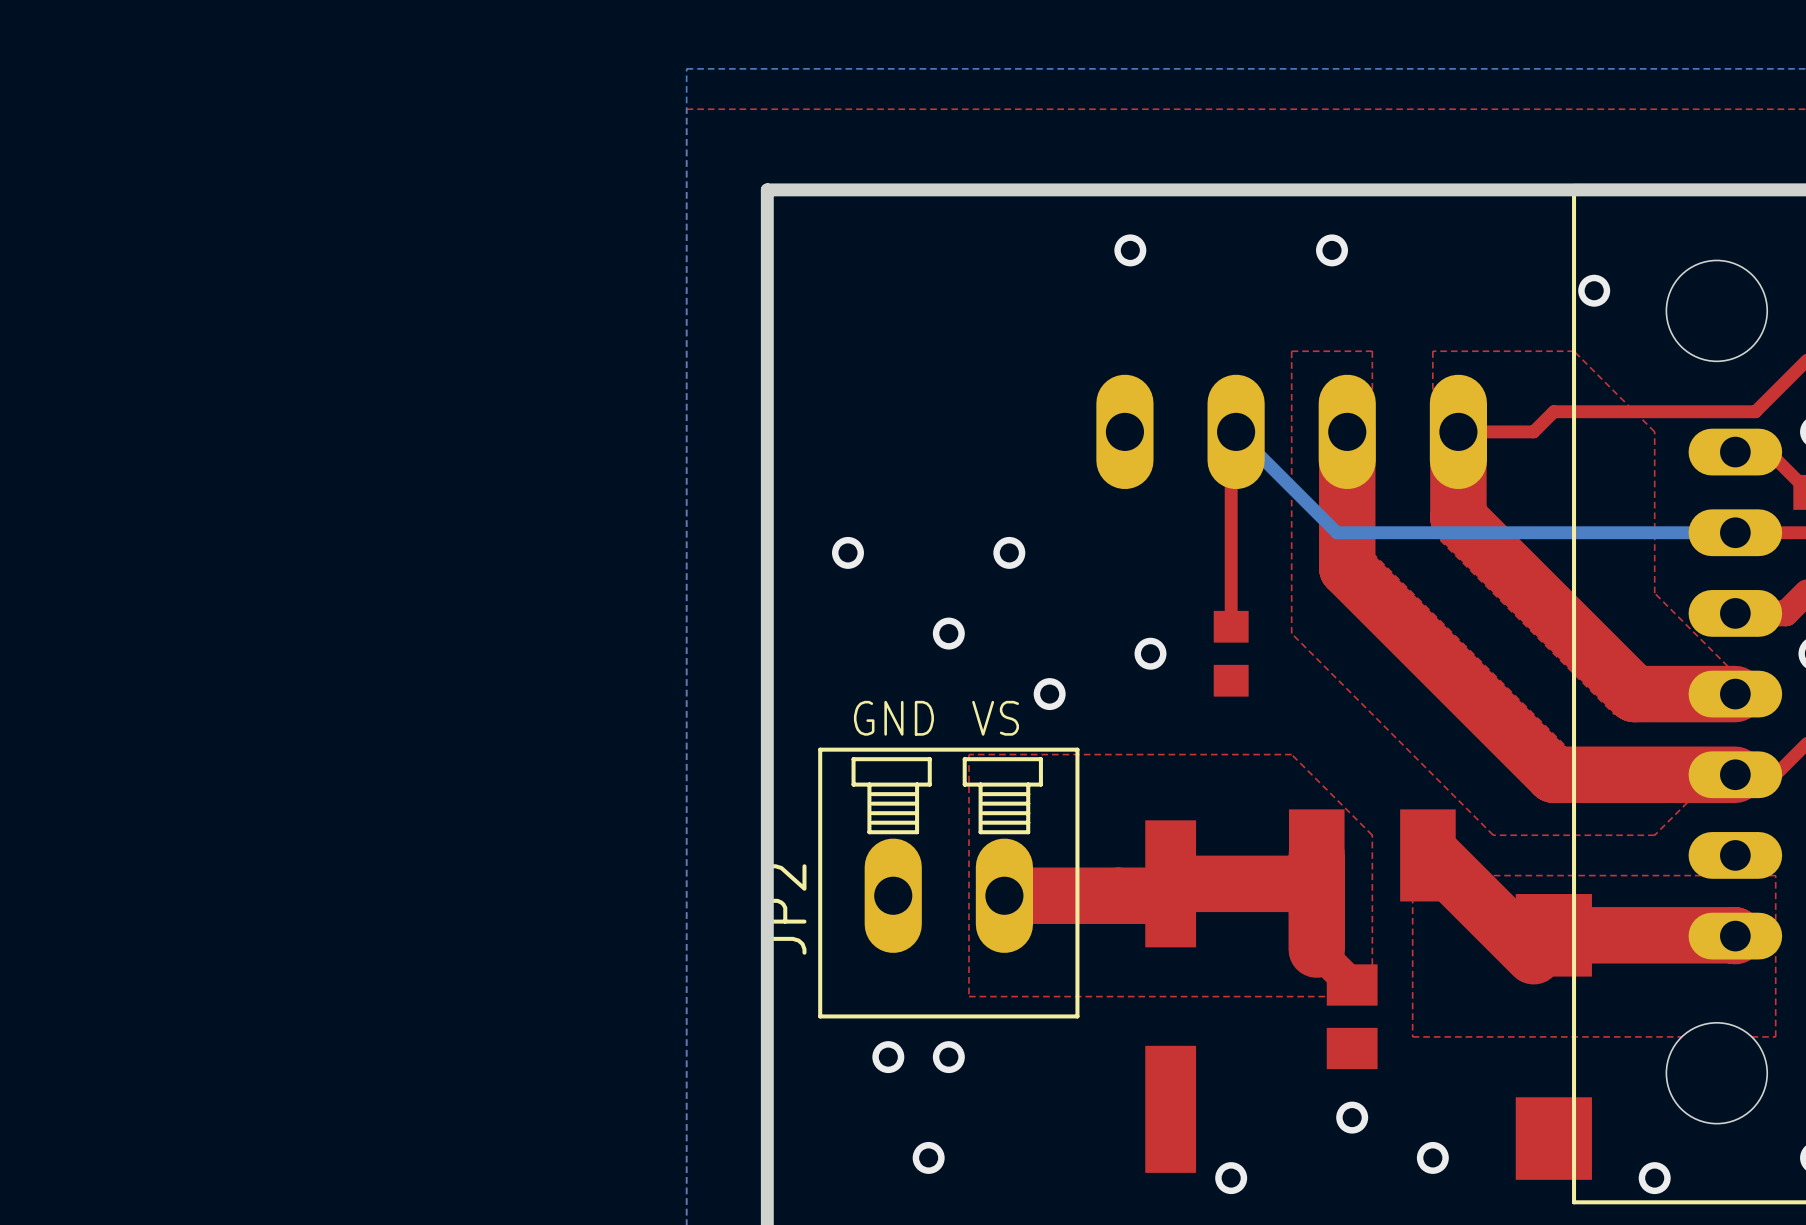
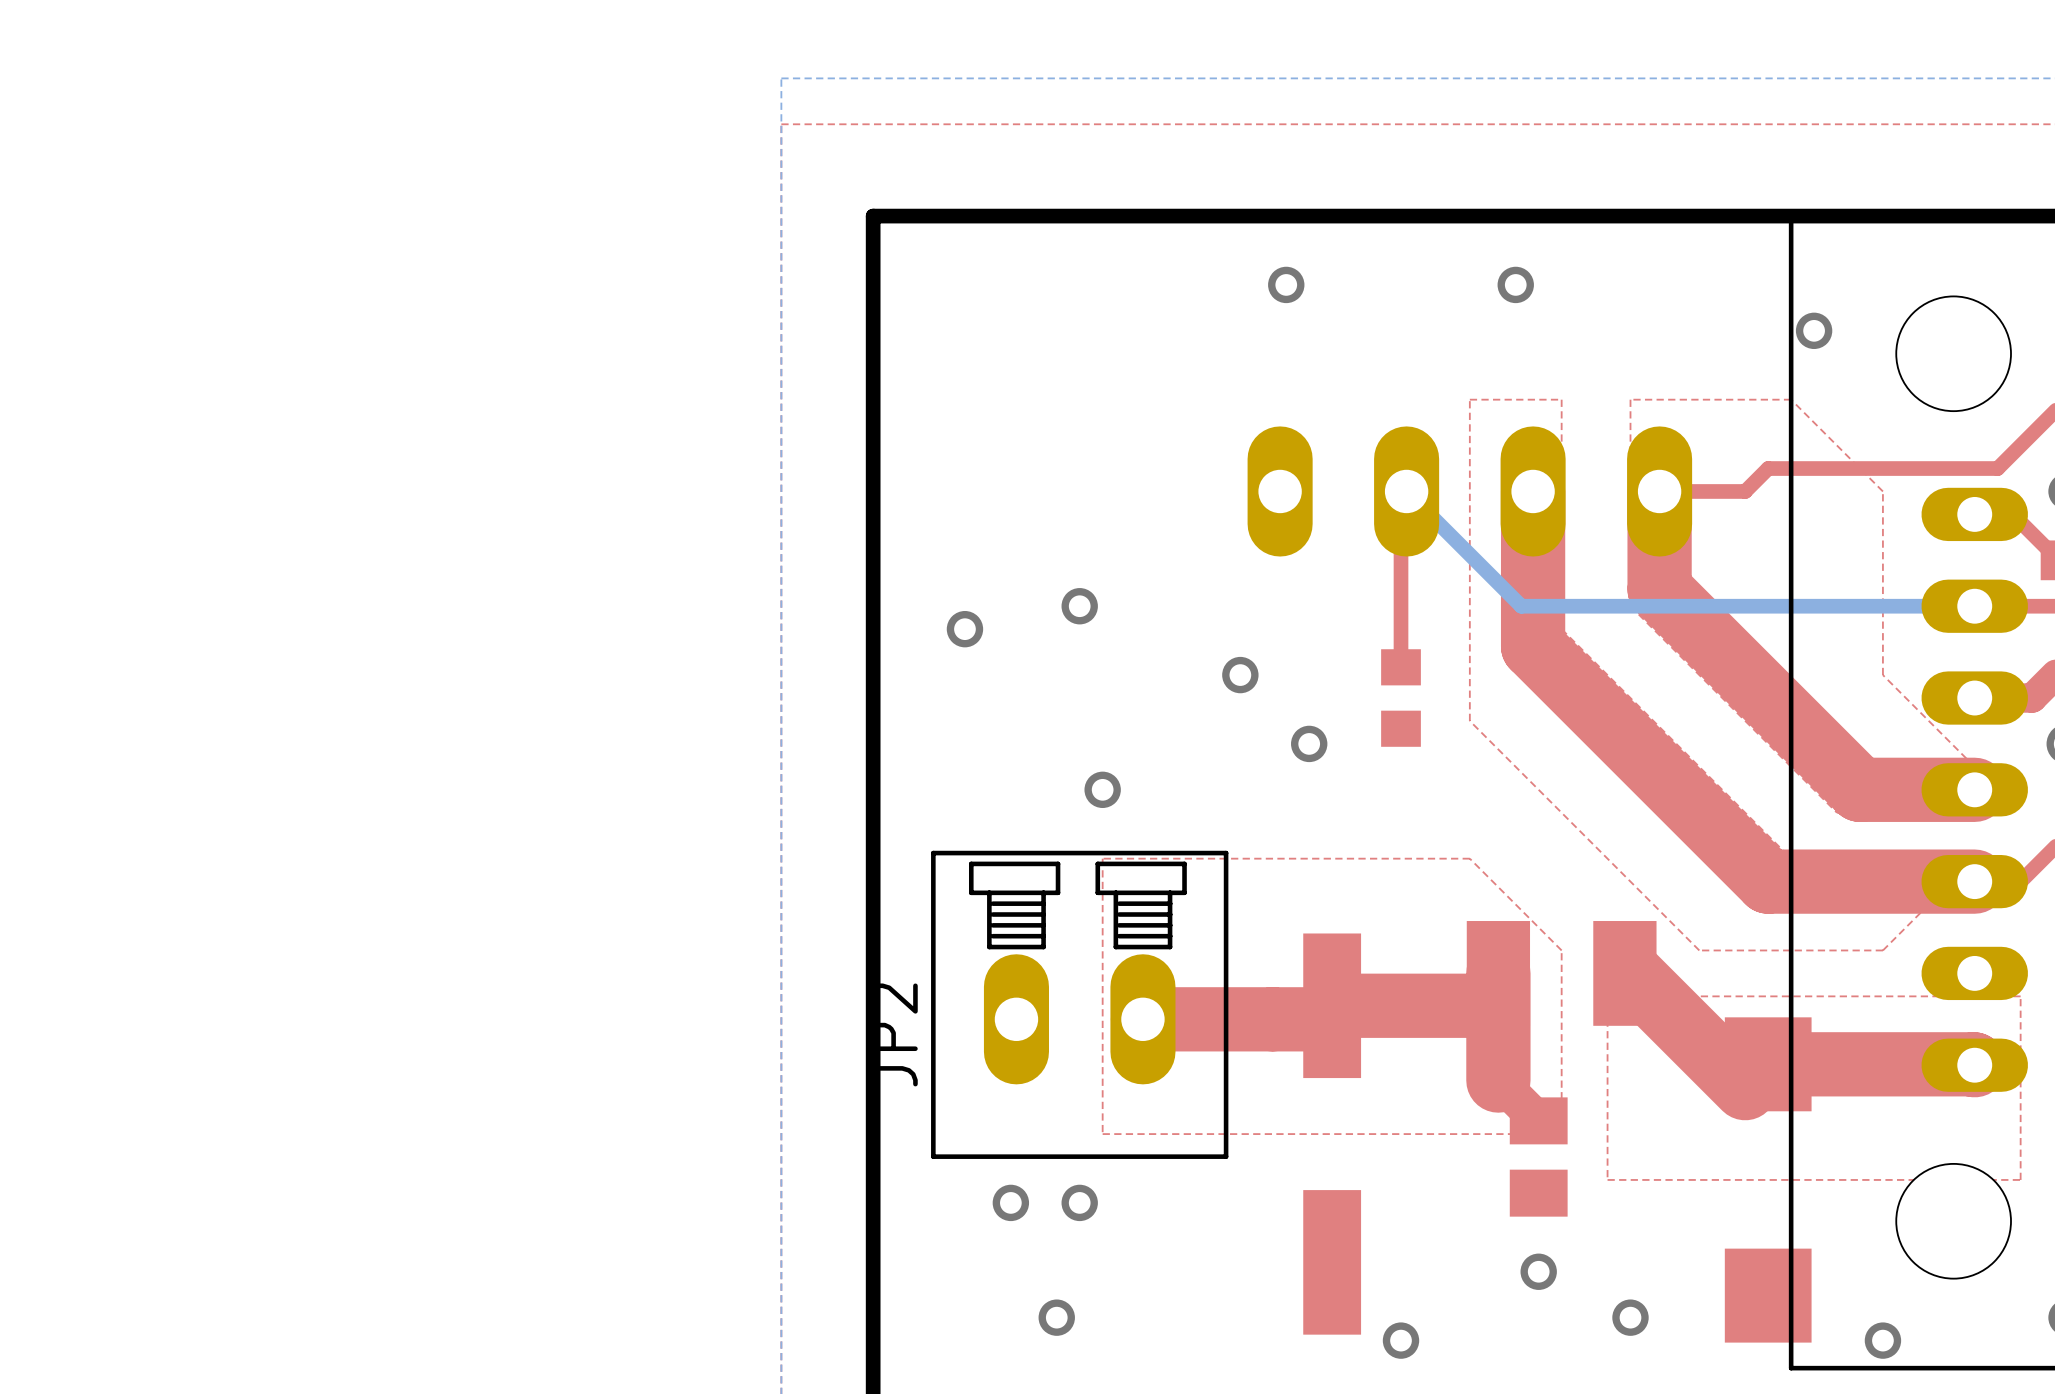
via: none -> (1079, 606)
via: (1009, 552) -> none
top track: (1231, 586) (1231, 626) -> none
via: none -> (1240, 675)
via: (948, 633) -> none
part position: (1231, 653) -> (1401, 698)
via: none -> (1102, 789)
via: (1049, 694) -> none
text: GND (893, 718) -> none
text: VS (995, 718) -> none

